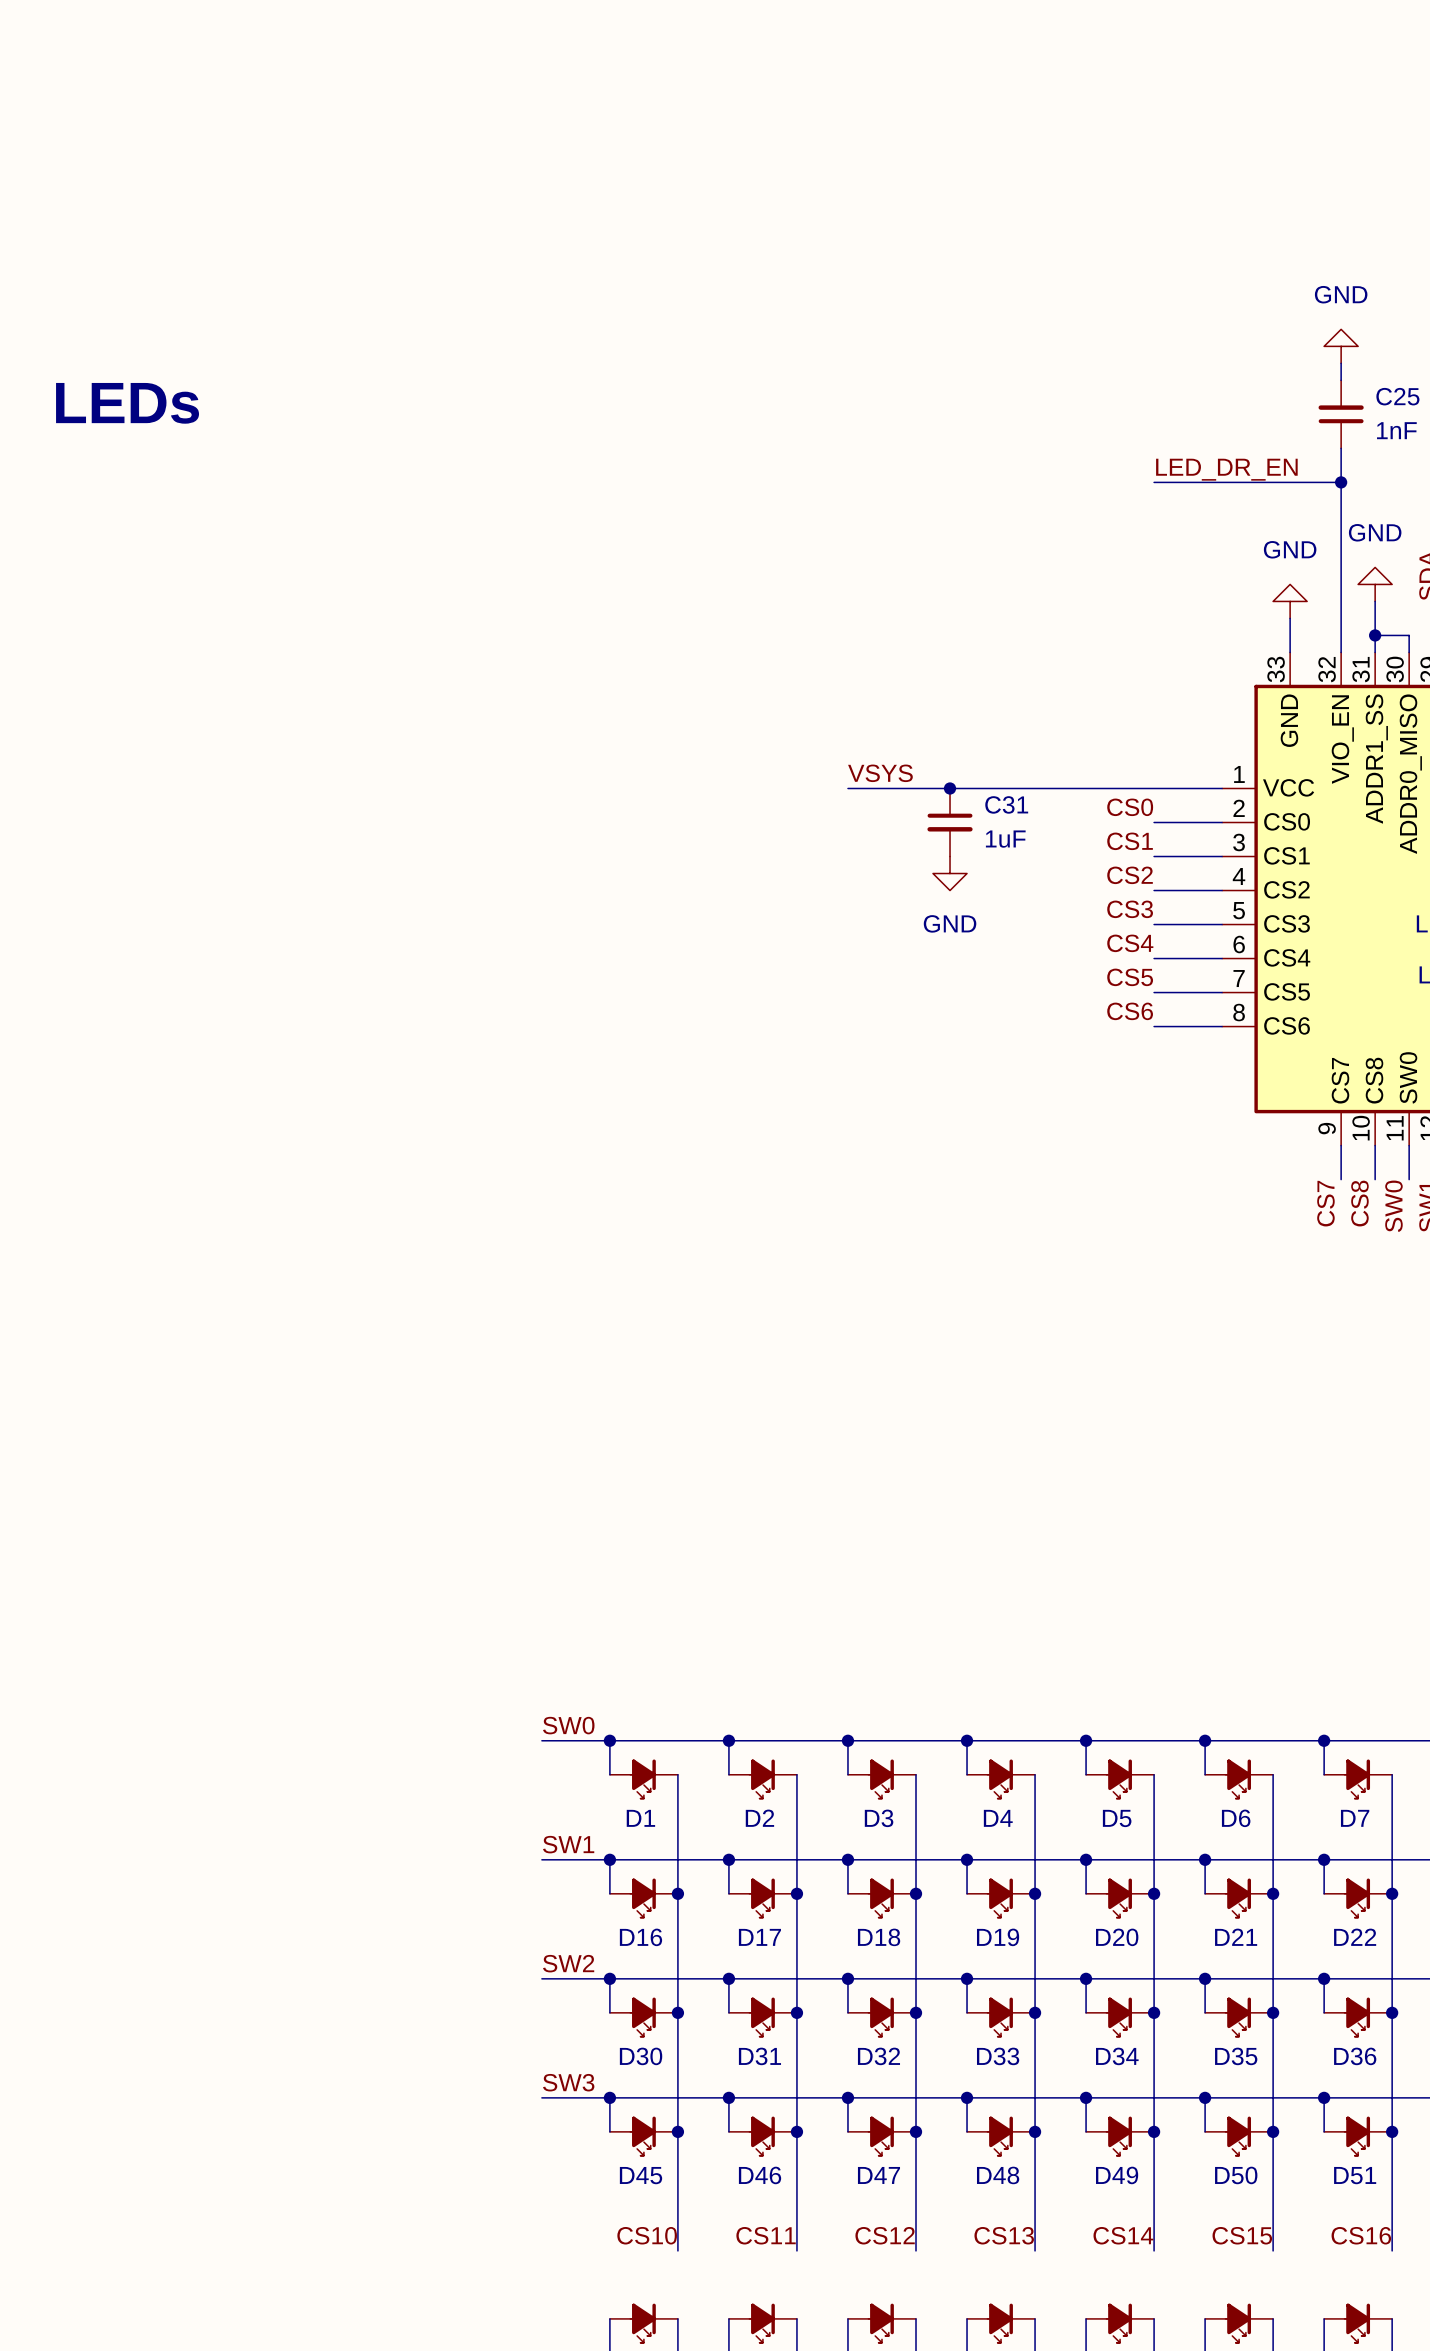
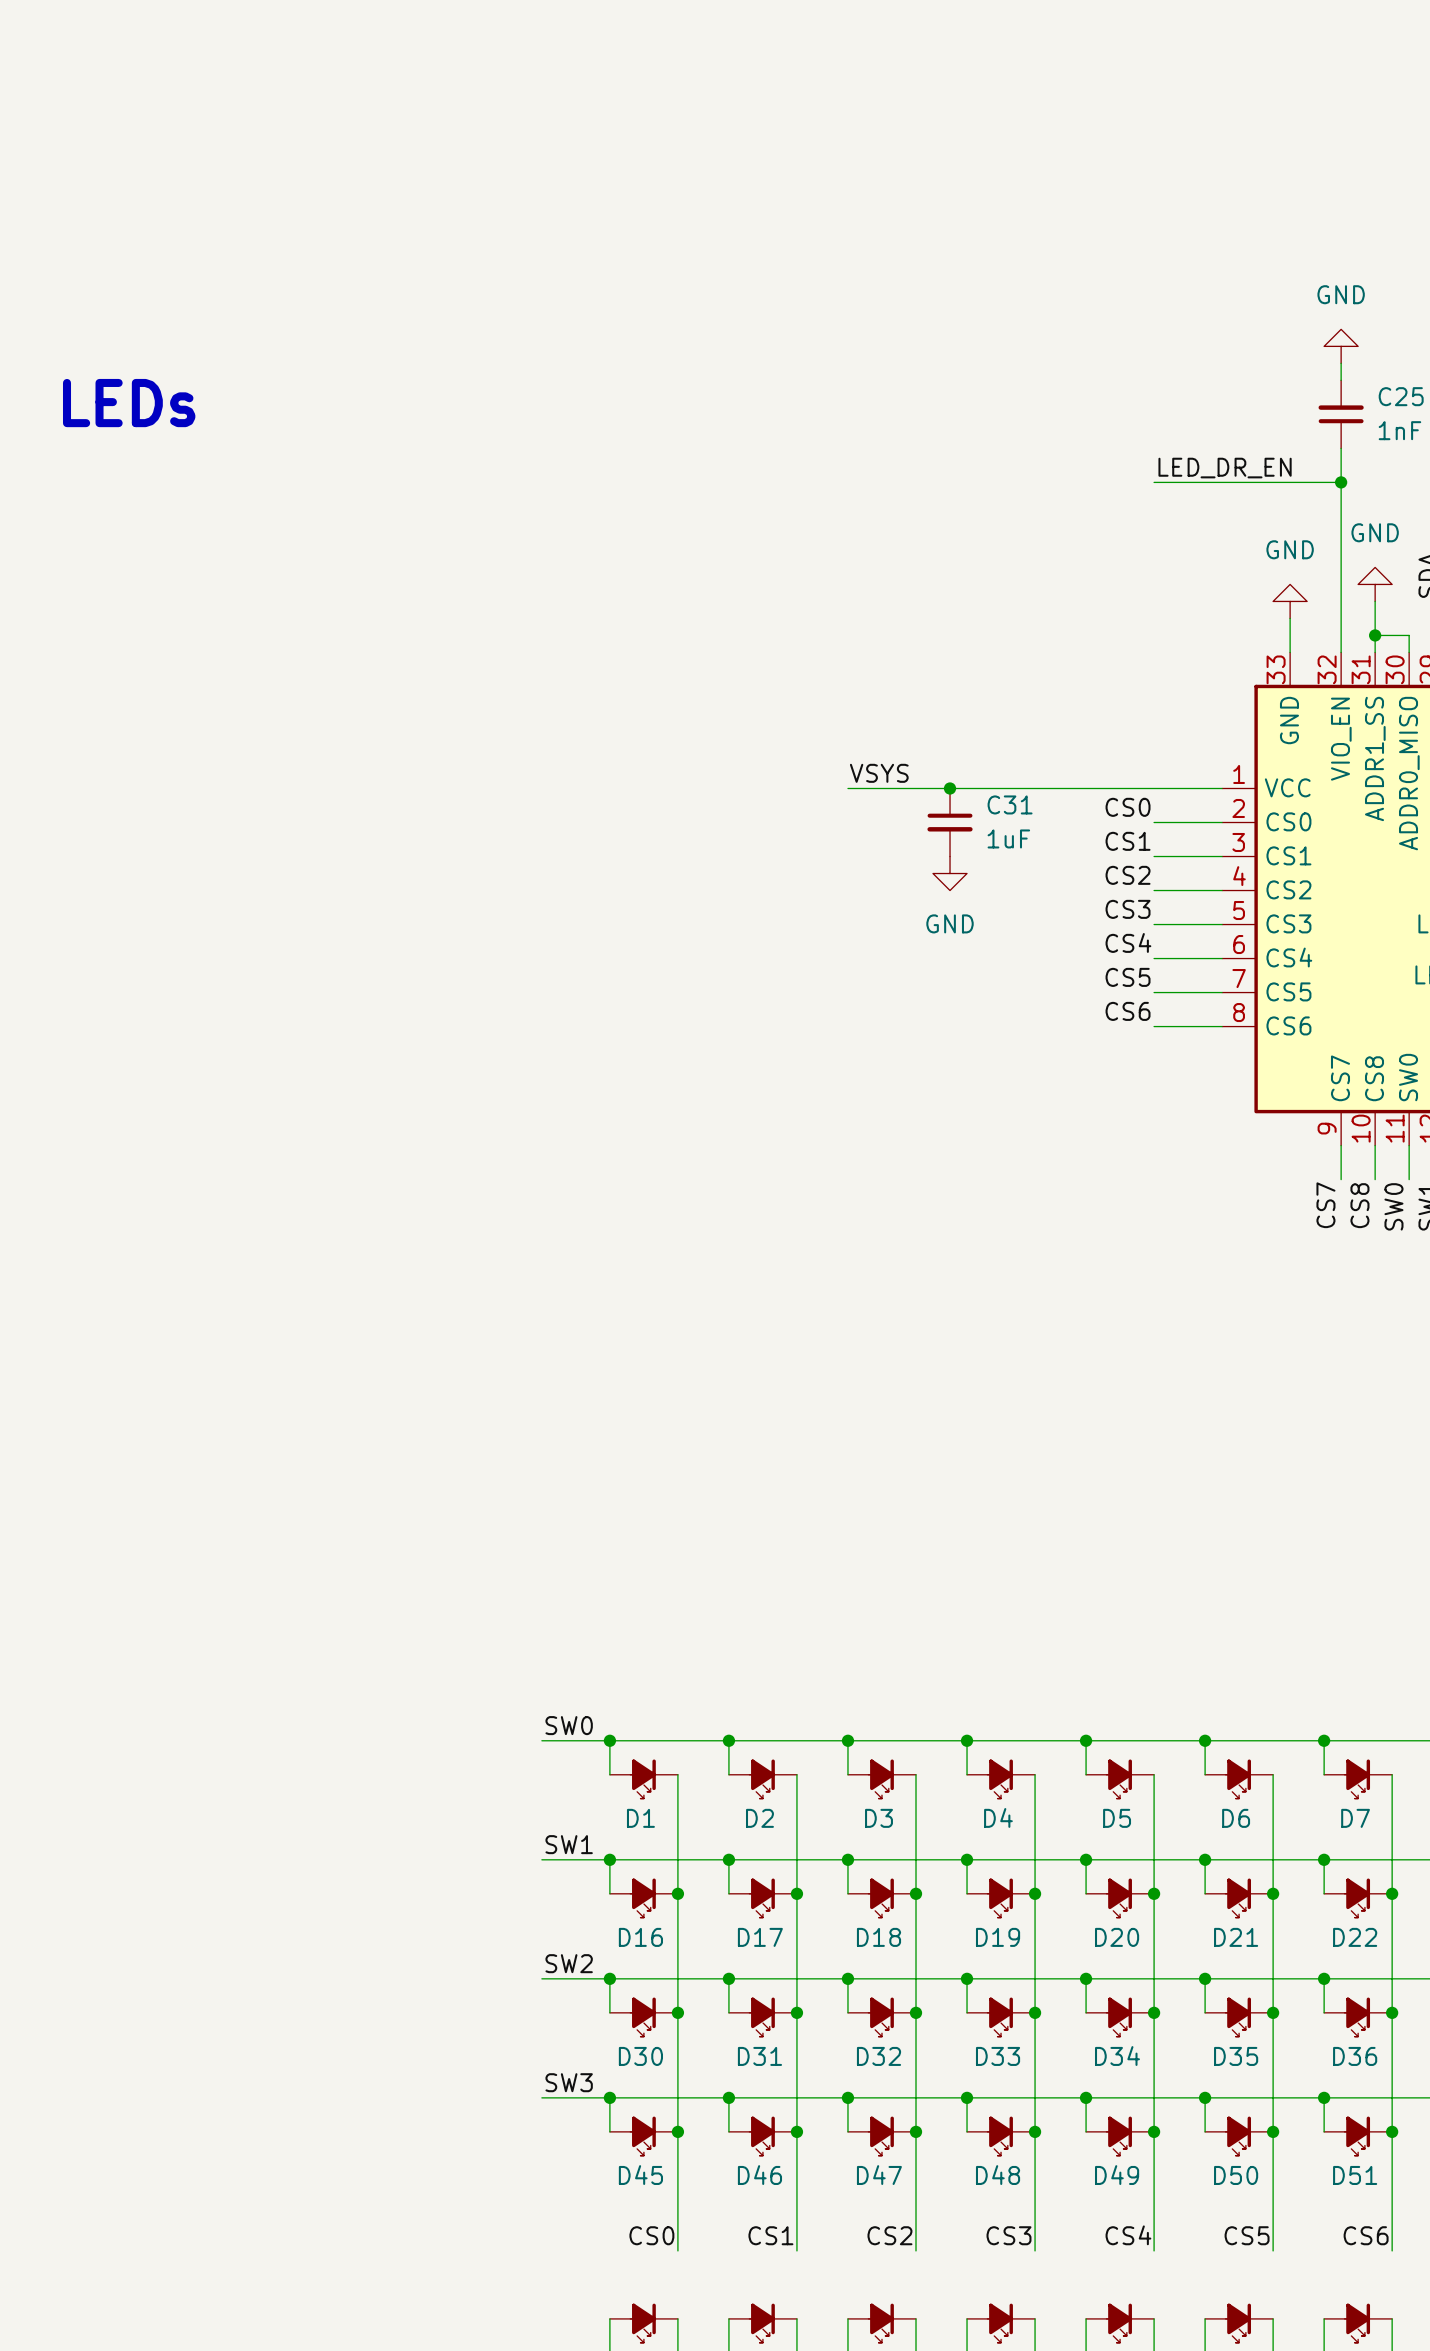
label: CS10 (647, 2235) -> CS0 (651, 2235)
label: CS11 (766, 2235) -> CS1 (770, 2235)
label: CS12 (885, 2235) -> CS2 (889, 2235)
label: CS13 (1004, 2235) -> CS3 (1008, 2235)
label: CS14 (1123, 2235) -> CS4 (1128, 2235)
label: CS15 (1242, 2235) -> CS5 (1247, 2235)
label: CS16 (1361, 2235) -> CS6 (1366, 2235)

